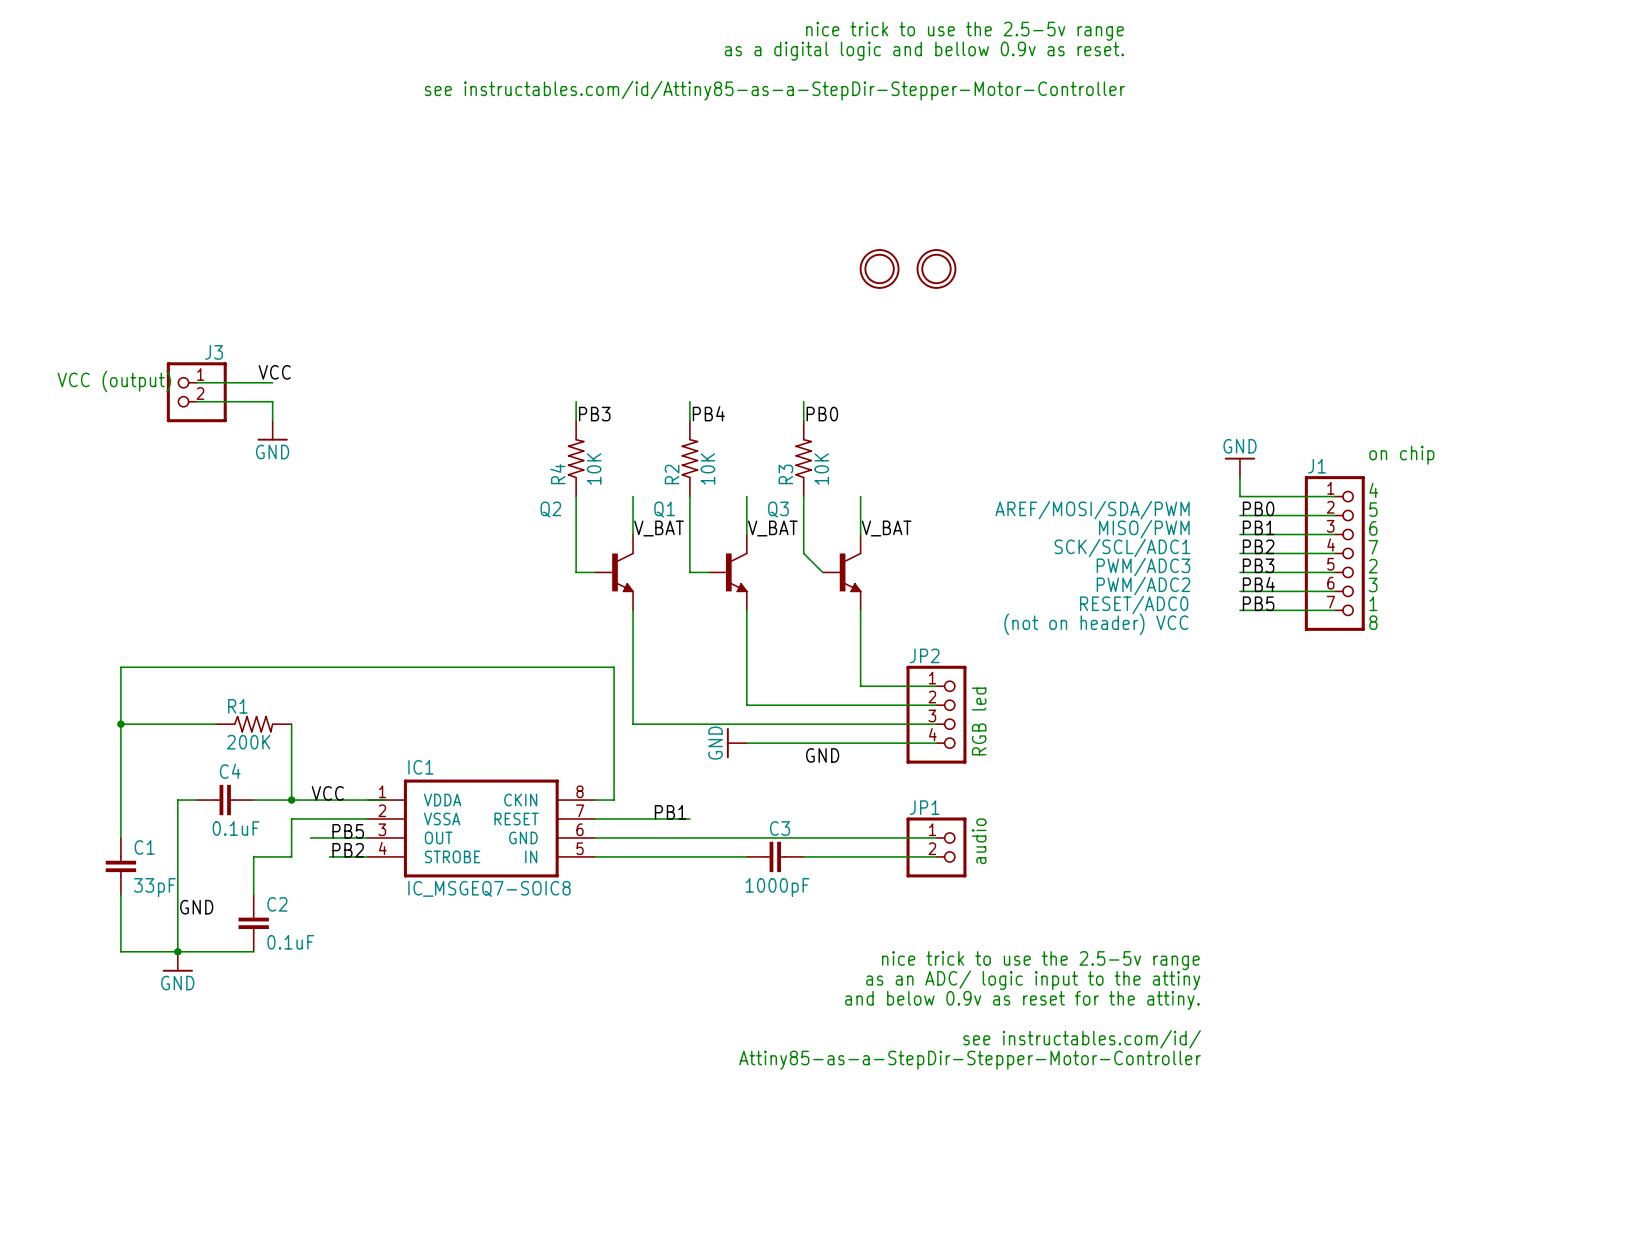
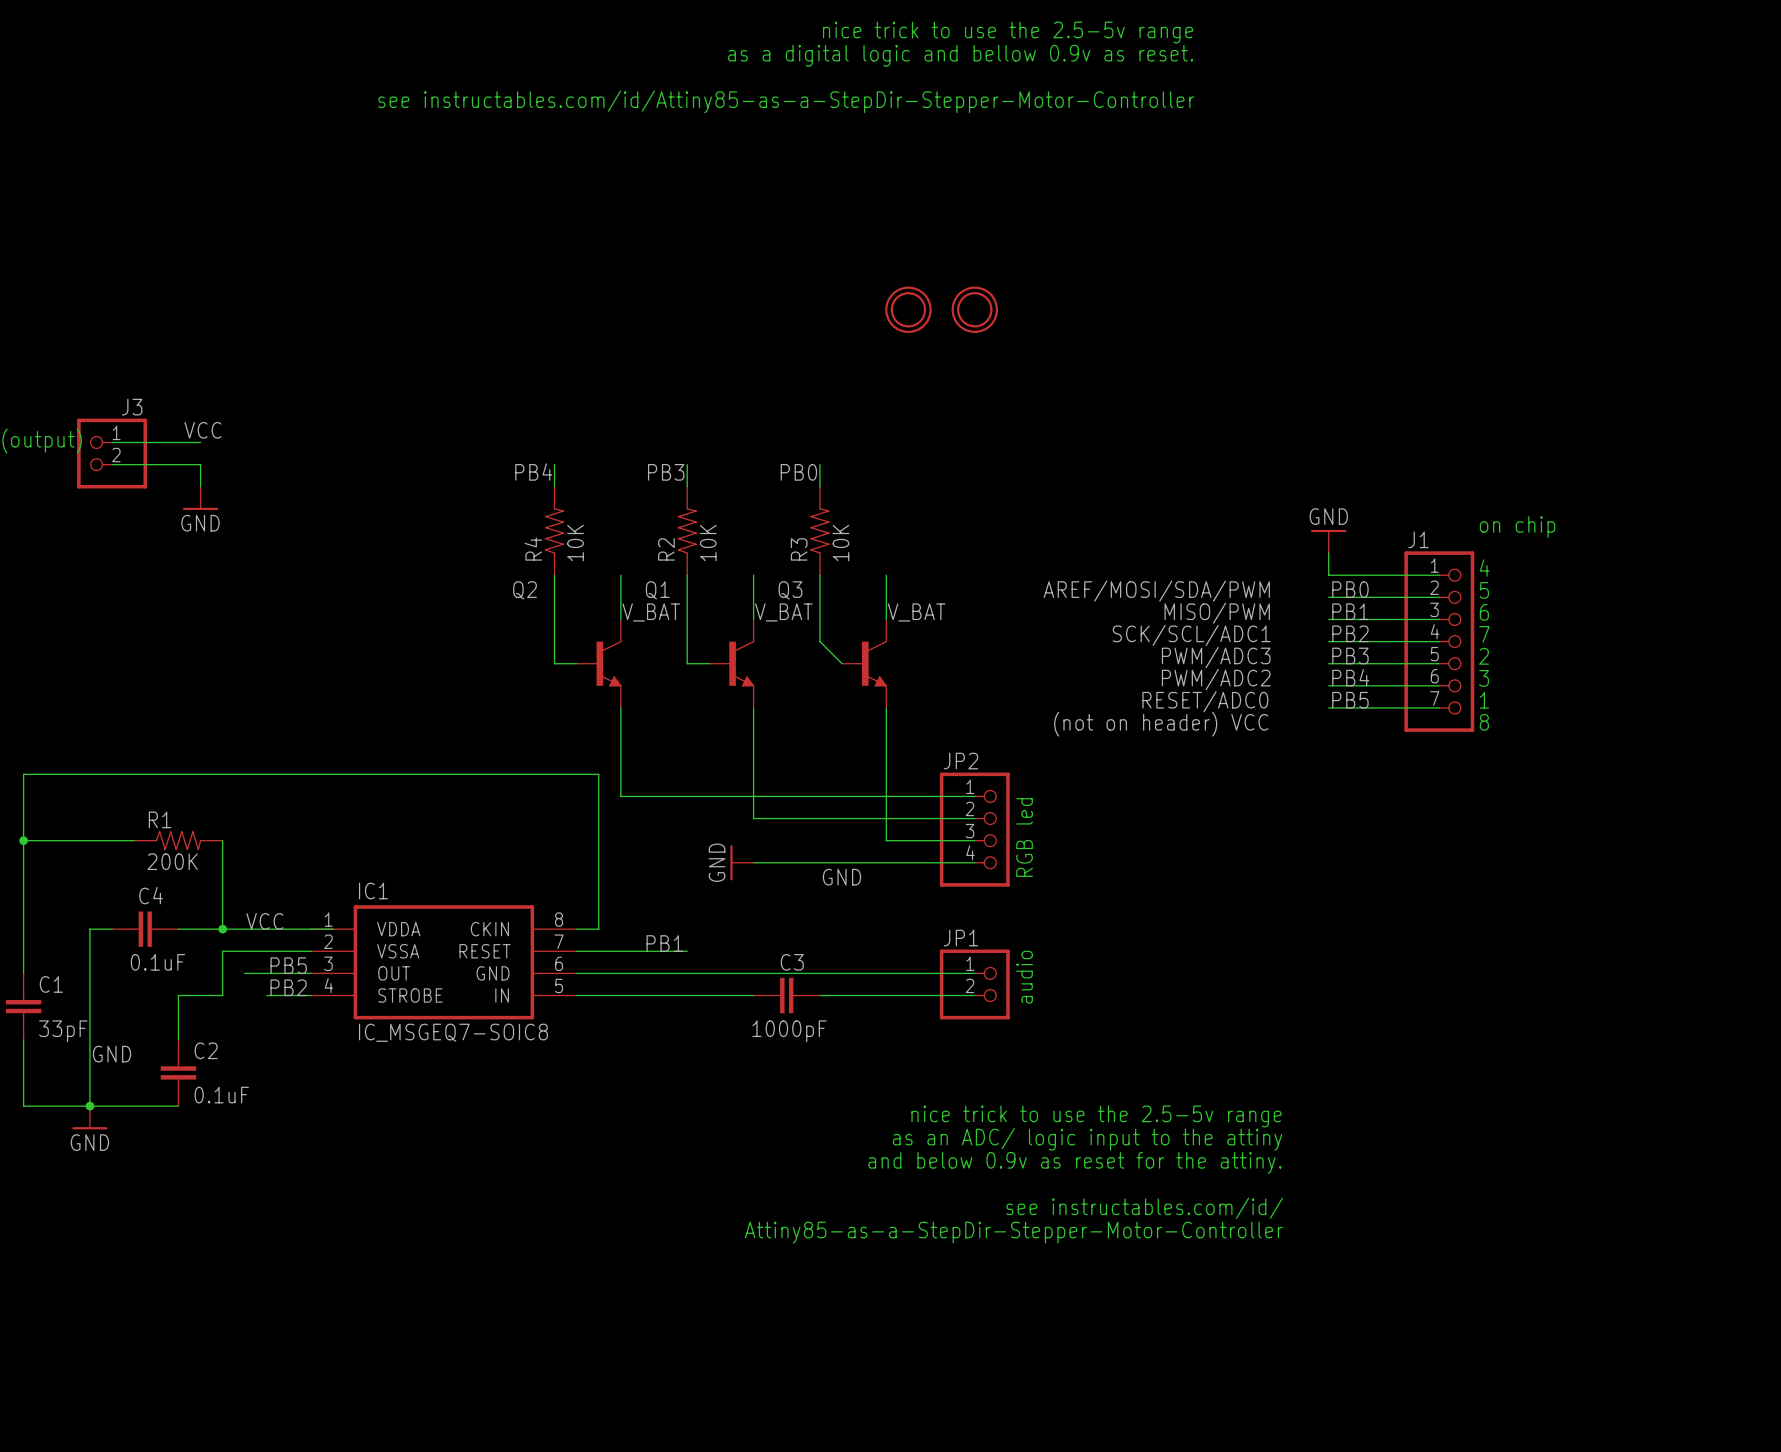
label position: PB4 (708, 413) -> PB4 (533, 471)
label position: PB3 (594, 414) -> PB3 (666, 472)
label position: PB0 (822, 414) -> PB0 (798, 472)
wire: (633, 686) (633, 724) (860, 724) -> (620, 796) (886, 796) (886, 840)

